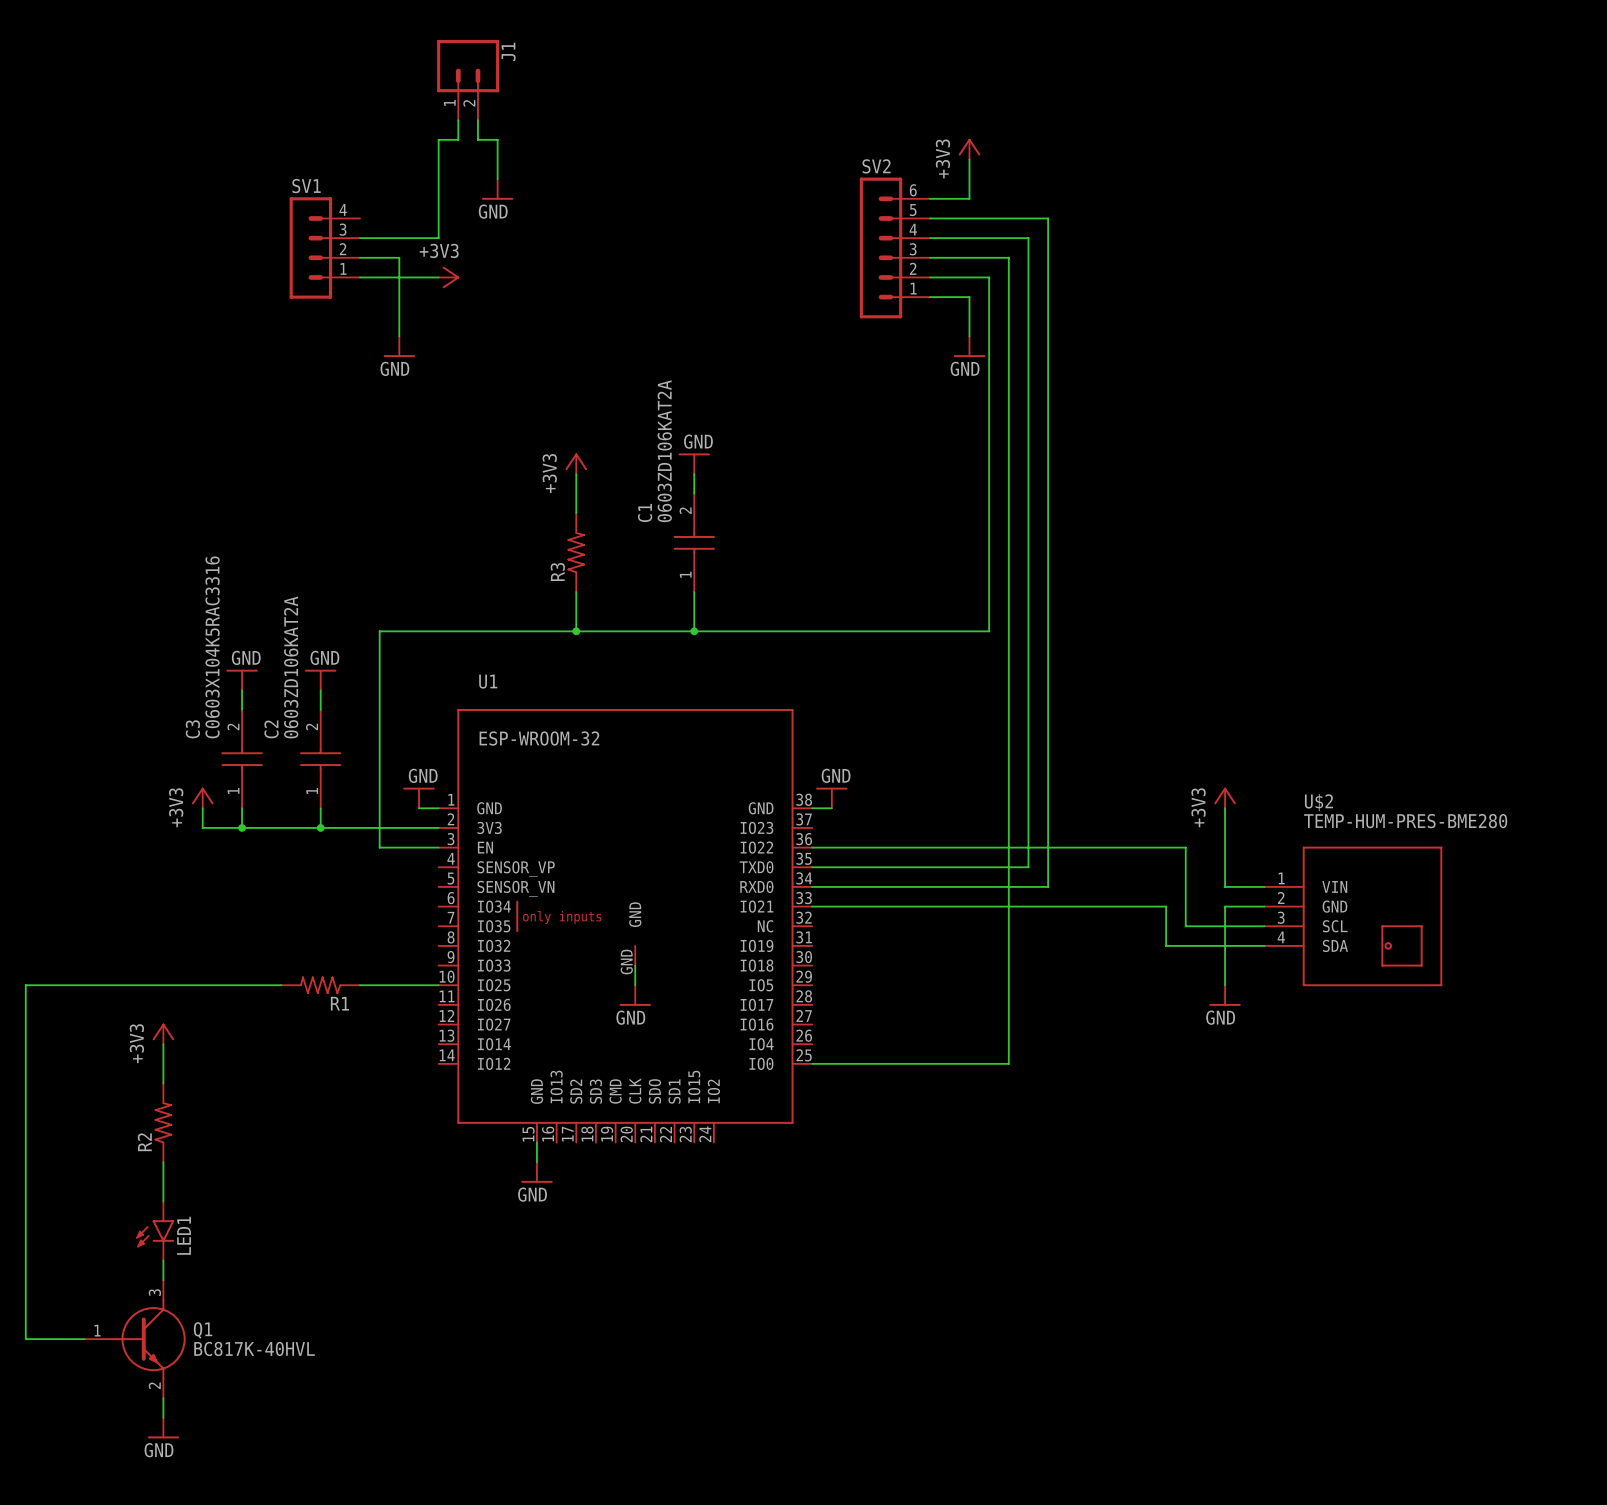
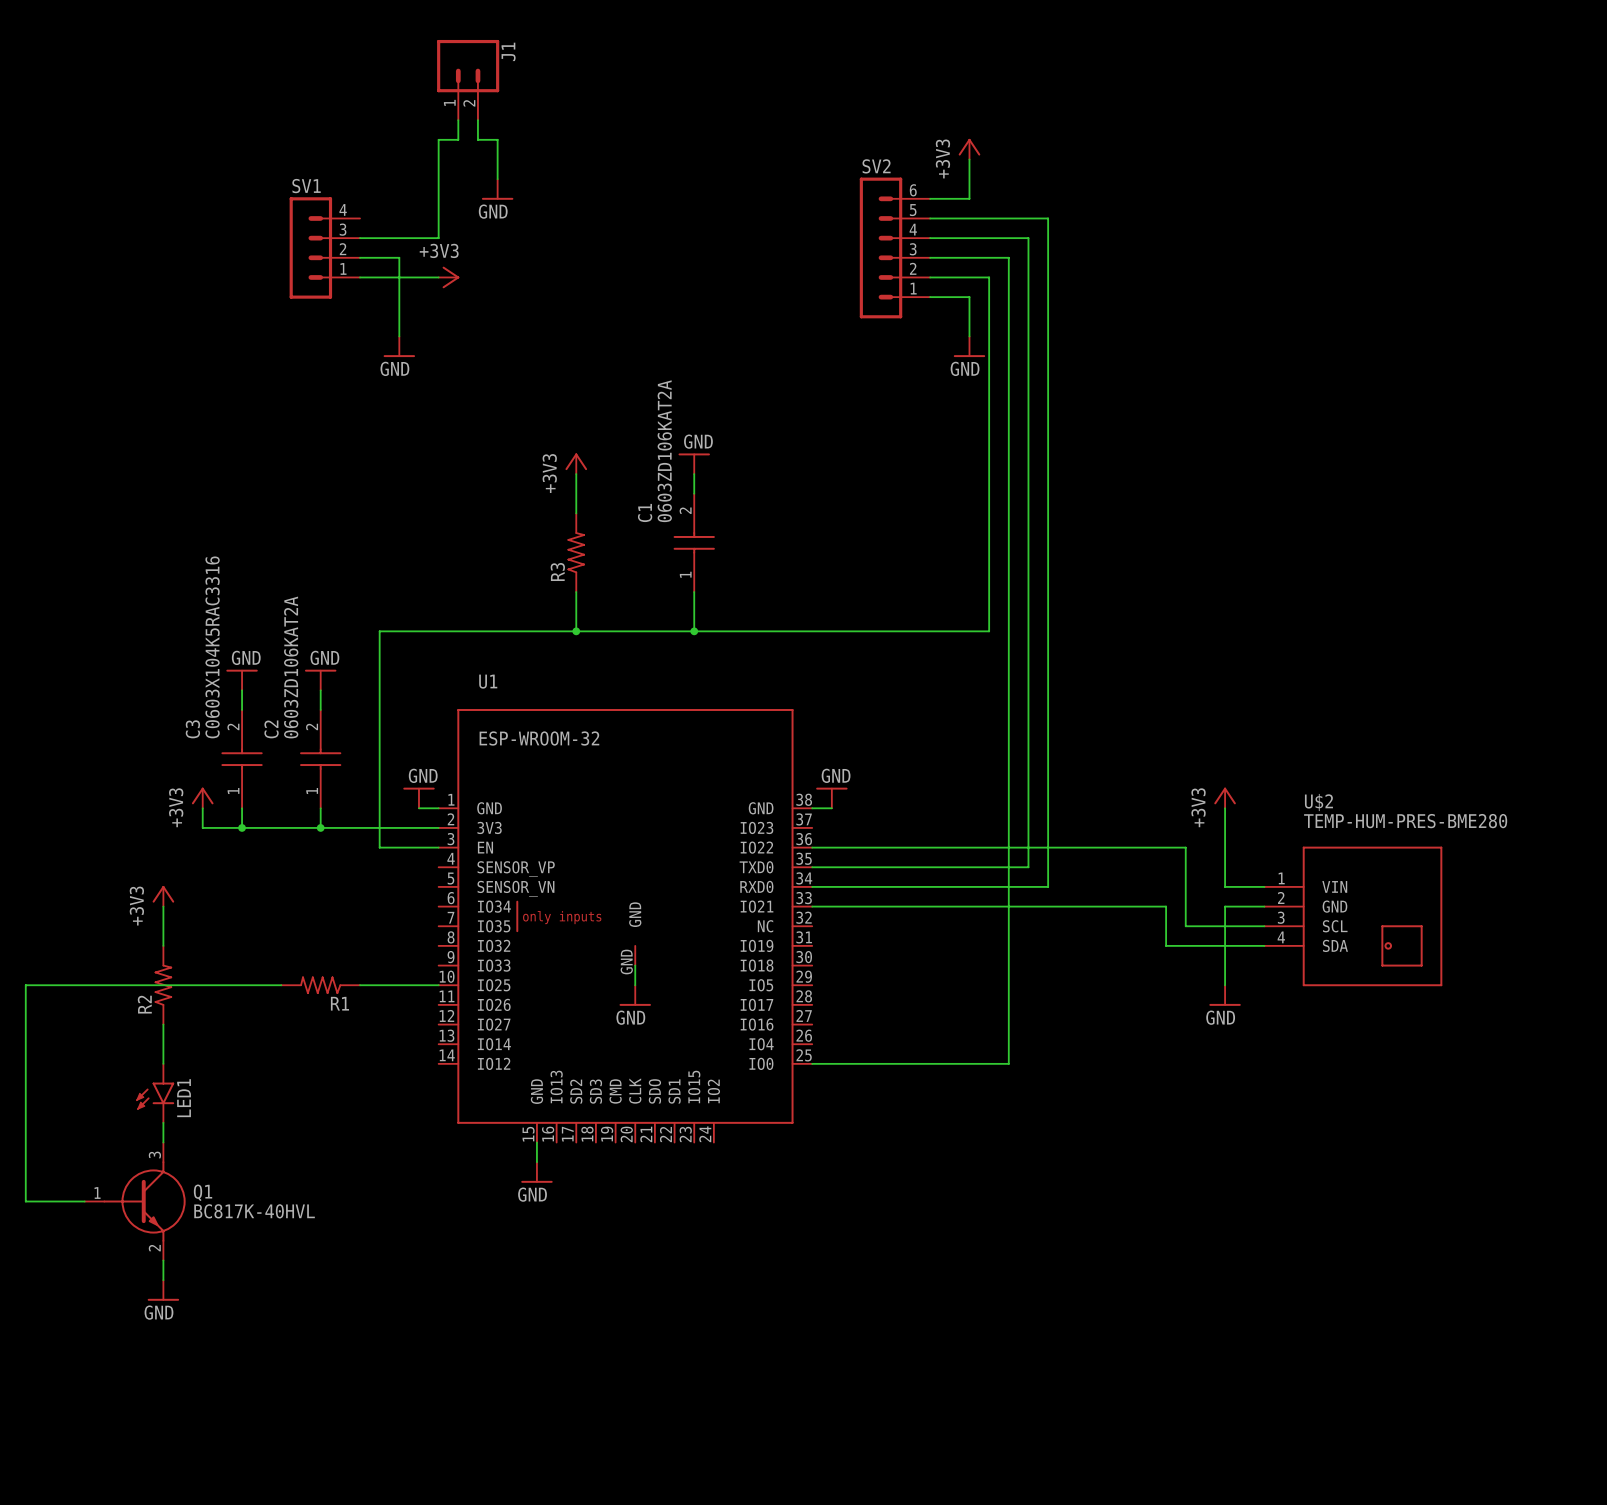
wire: none -> (163, 906) (163, 945)
power symbol position: +3V3 (163, 1033) -> +3V3 (163, 896)
wire: none -> (163, 1122) (163, 1142)
R2 position: (163, 1122) -> (163, 985)
wire: (163, 1162) (163, 1201) -> none
wire: (25, 1201) (25, 1339) (84, 1339) -> (25, 1201) (84, 1201)
LED1 position: (155, 1230) -> (155, 1093)
Q1 position: (135, 1339) -> (135, 1201)
wire: (163, 1398) (163, 1417) -> none
power symbol position: GND (163, 1428) -> GND (163, 1290)

